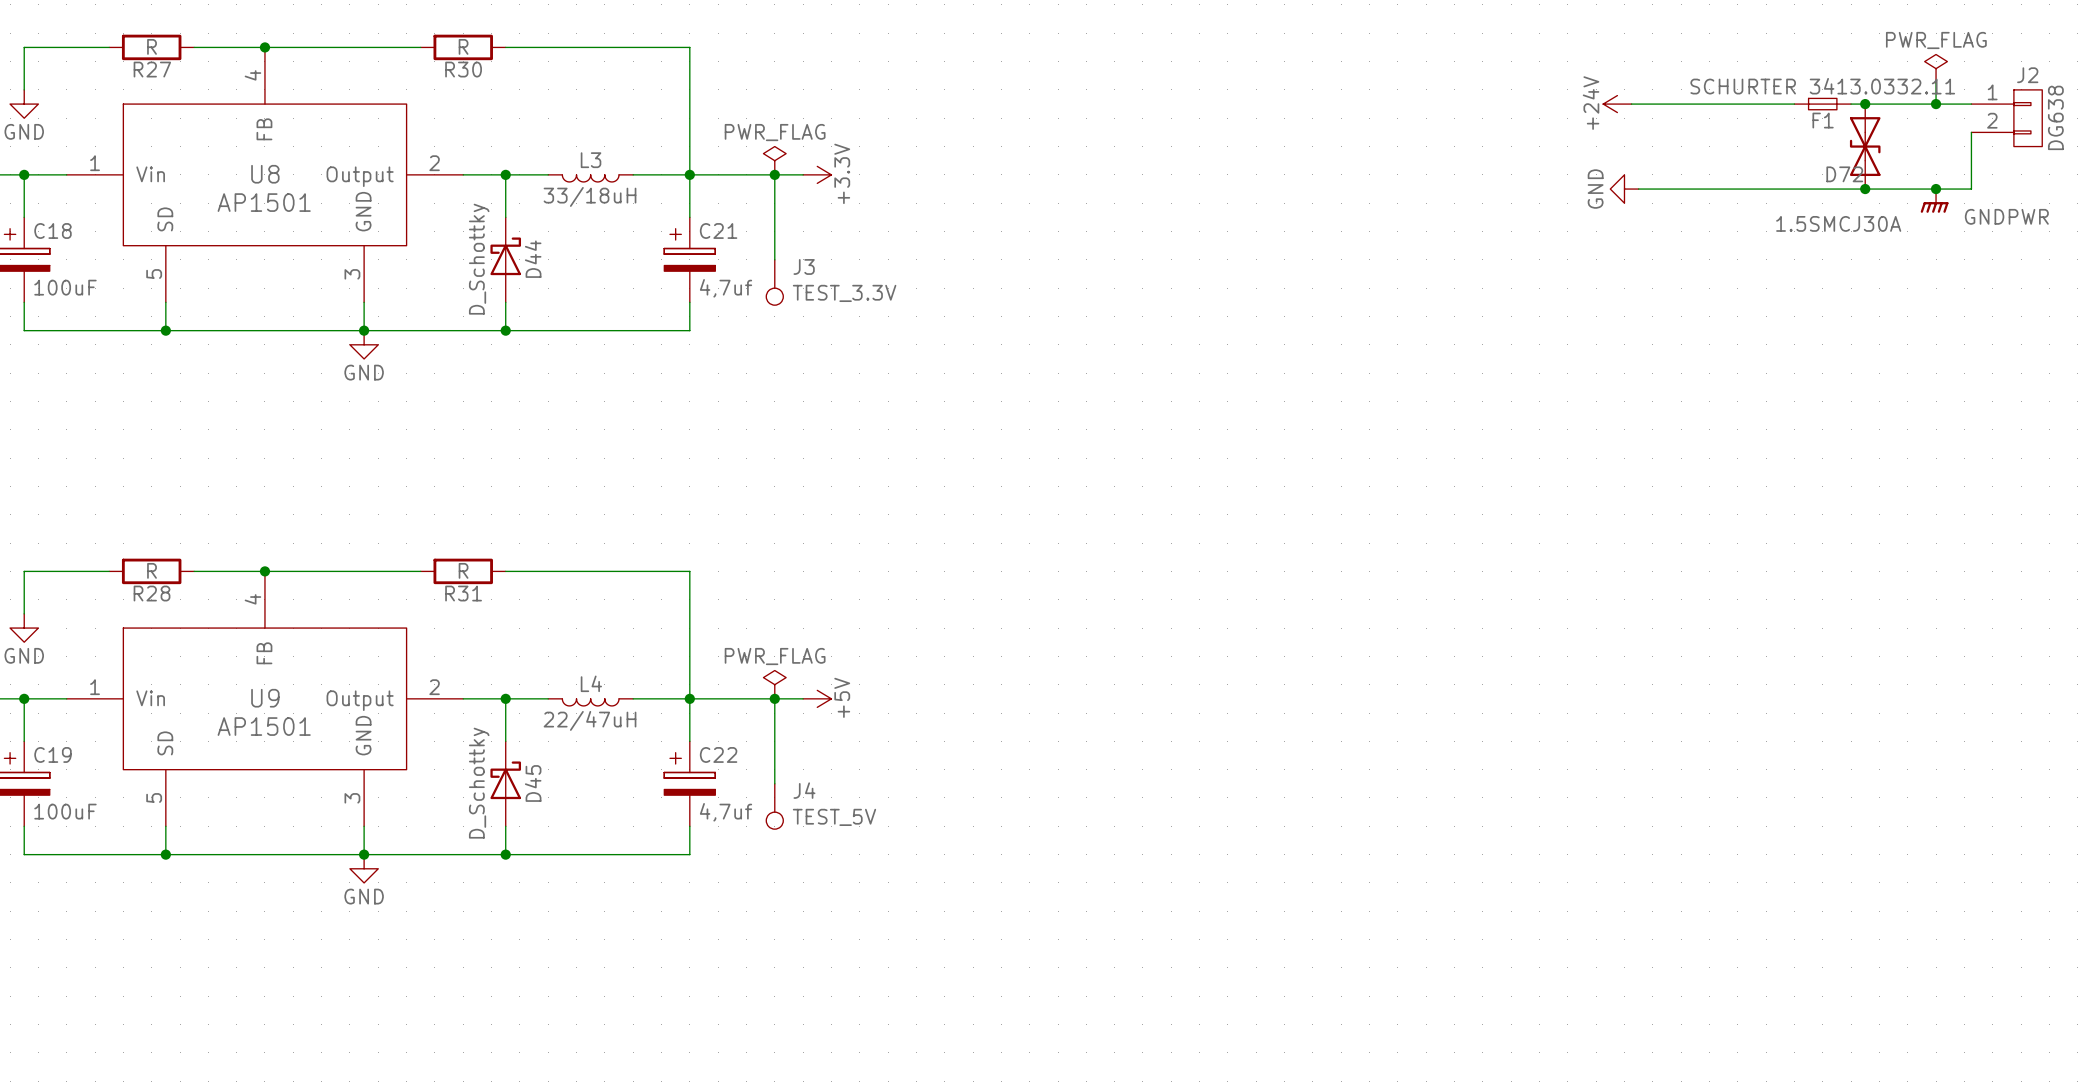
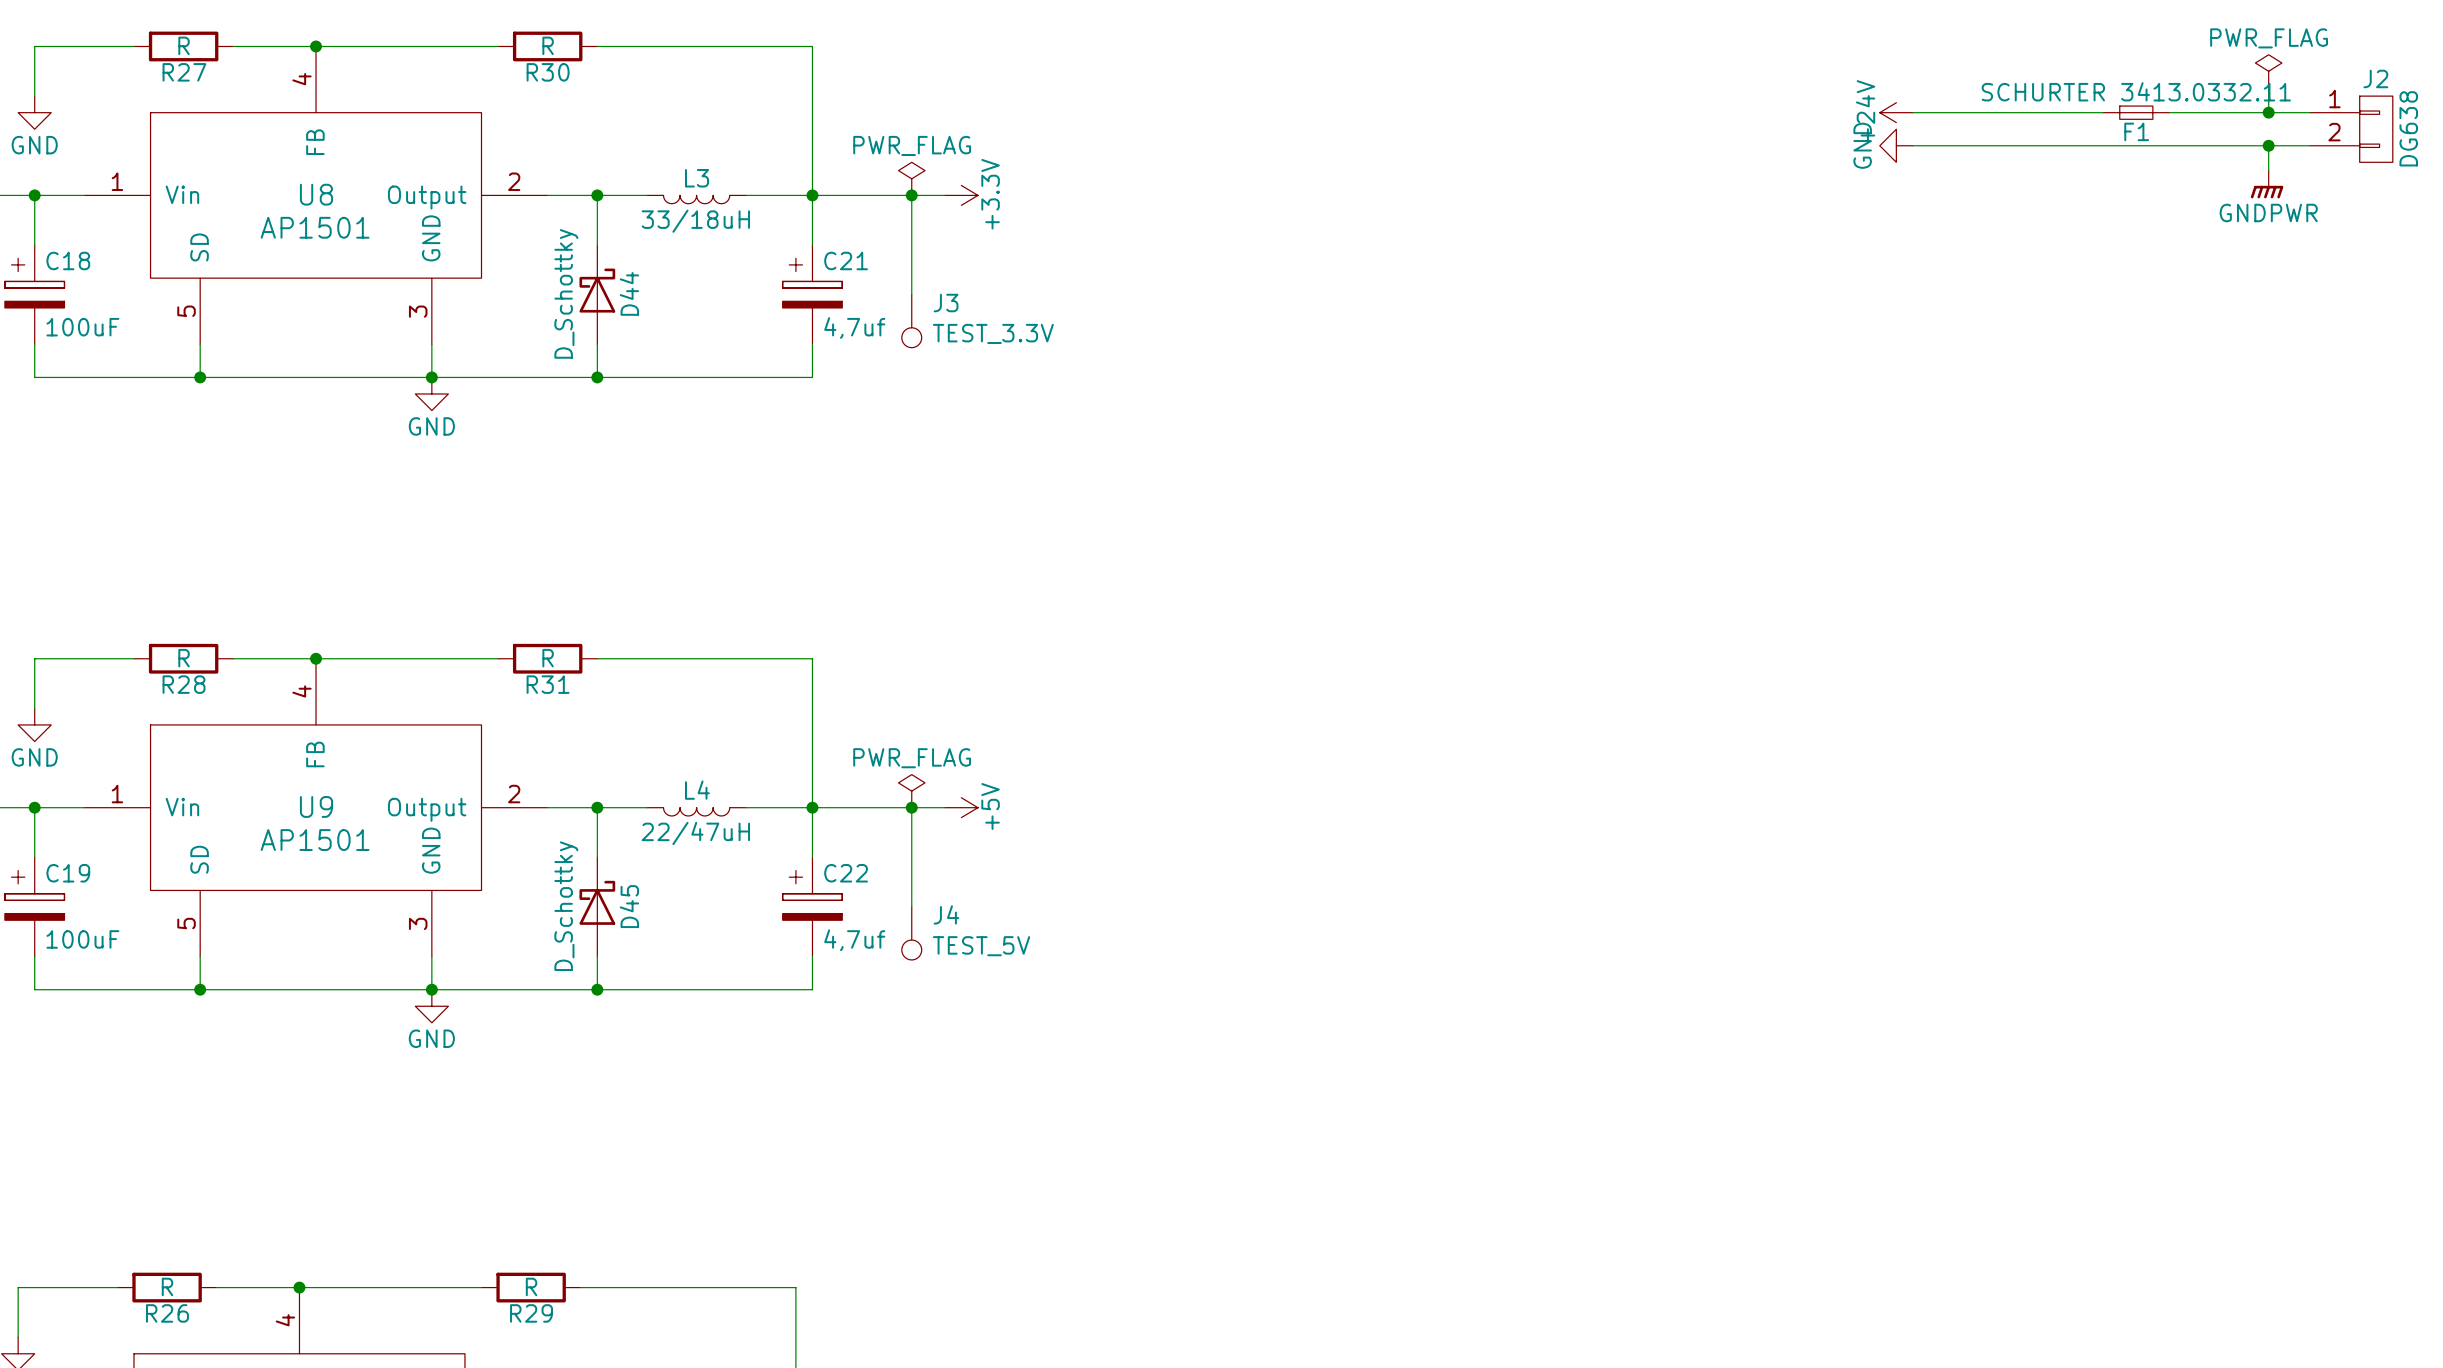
junction: (1865, 104) -> none
wire: none -> (2268, 145) (2268, 170)
junction: none -> (2268, 145)
wire: (1971, 132) (1971, 189) (1638, 189) -> (2310, 145) (1912, 145)
D72: 1.5SMCJ30A (1865, 146) -> none
power symbol position: GND (1624, 189) -> GND (1896, 145)
junction: (1865, 189) -> none
junction: (1936, 189) -> none
power symbol position: GNDPWR (1934, 200) -> GNDPWR (2267, 184)
power symbol text position: GNDPWR (2006, 216) -> GNDPWR (2268, 212)

